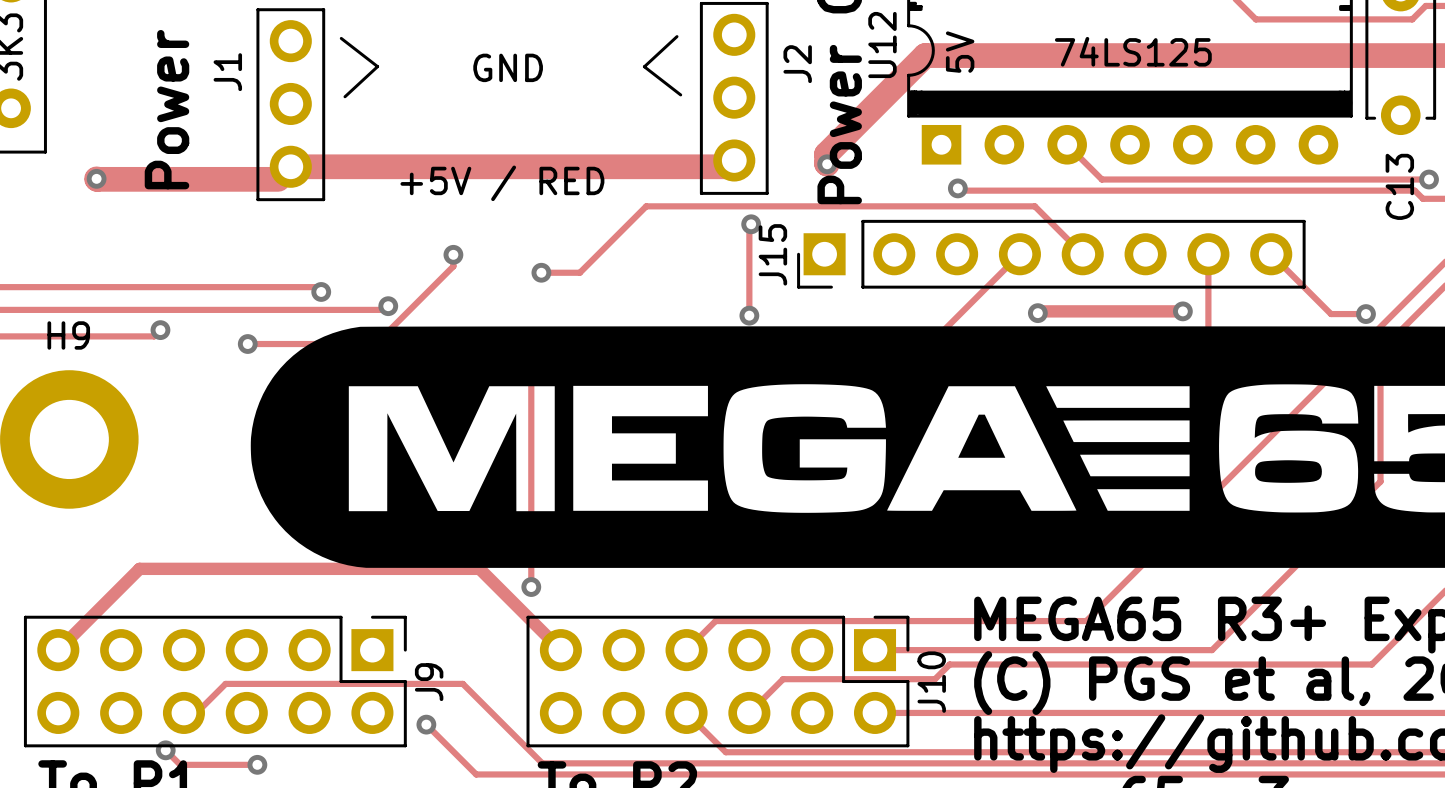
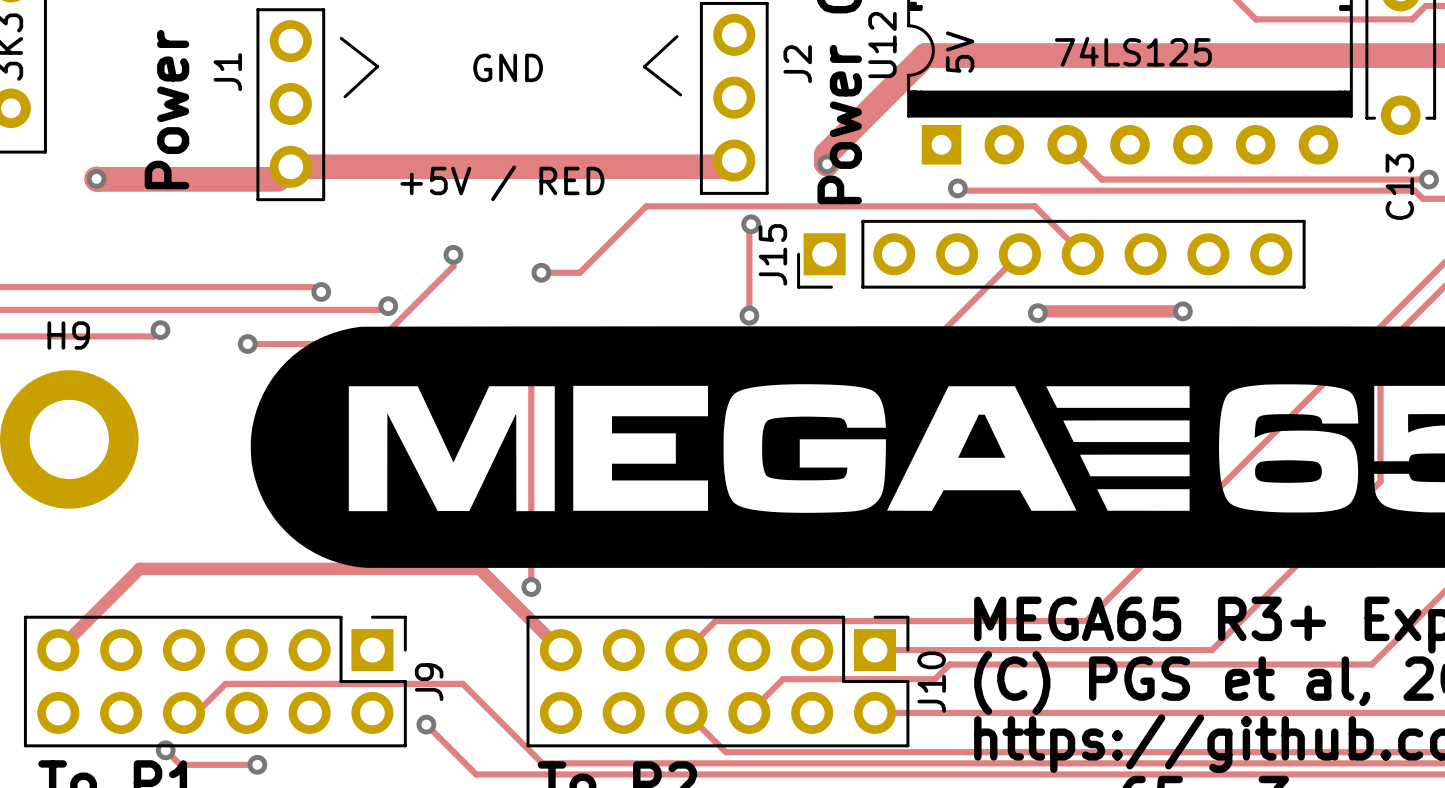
track: (1208, 254) (1208, 332) (1219, 343) -> none
track: (1271, 254) (1331, 314) (1365, 314) -> none
via: (1365, 314) -> none

